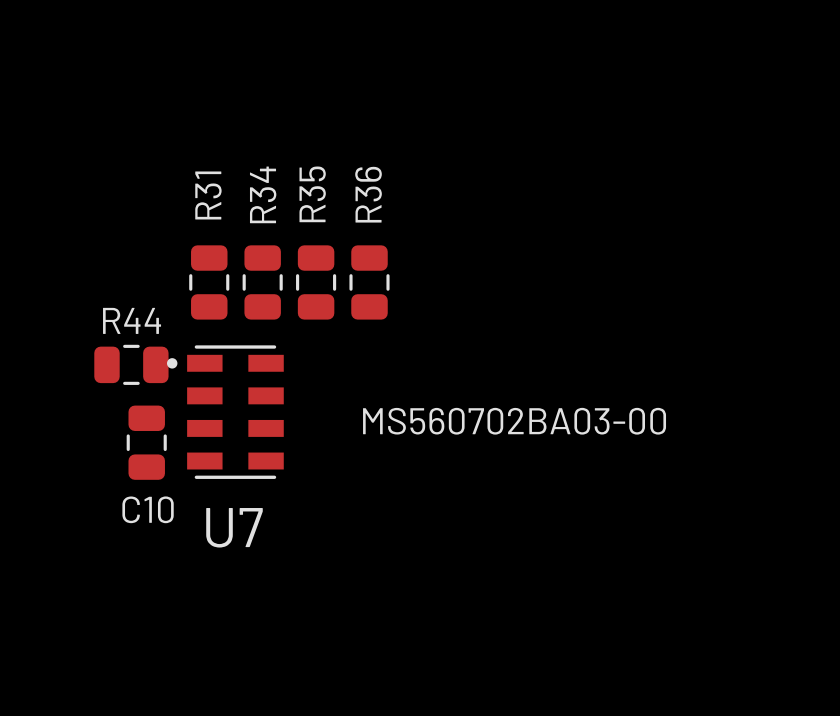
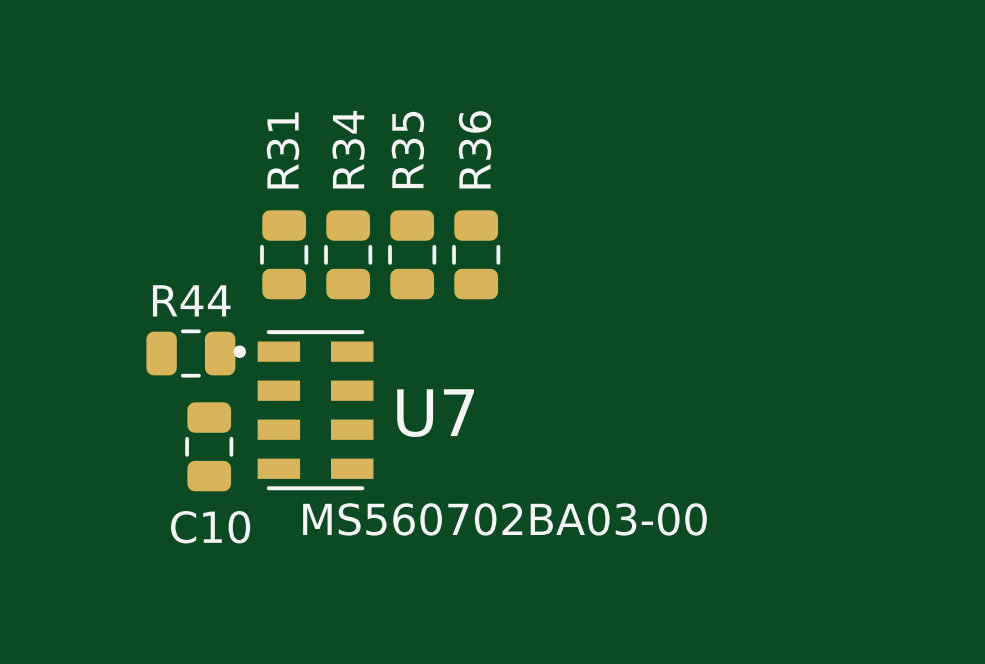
U7 value position: MS560702BA03-00 (514, 421) -> MS560702BA03-00 (504, 519)
U7 name position: U7 (234, 527) -> U7 (435, 413)

